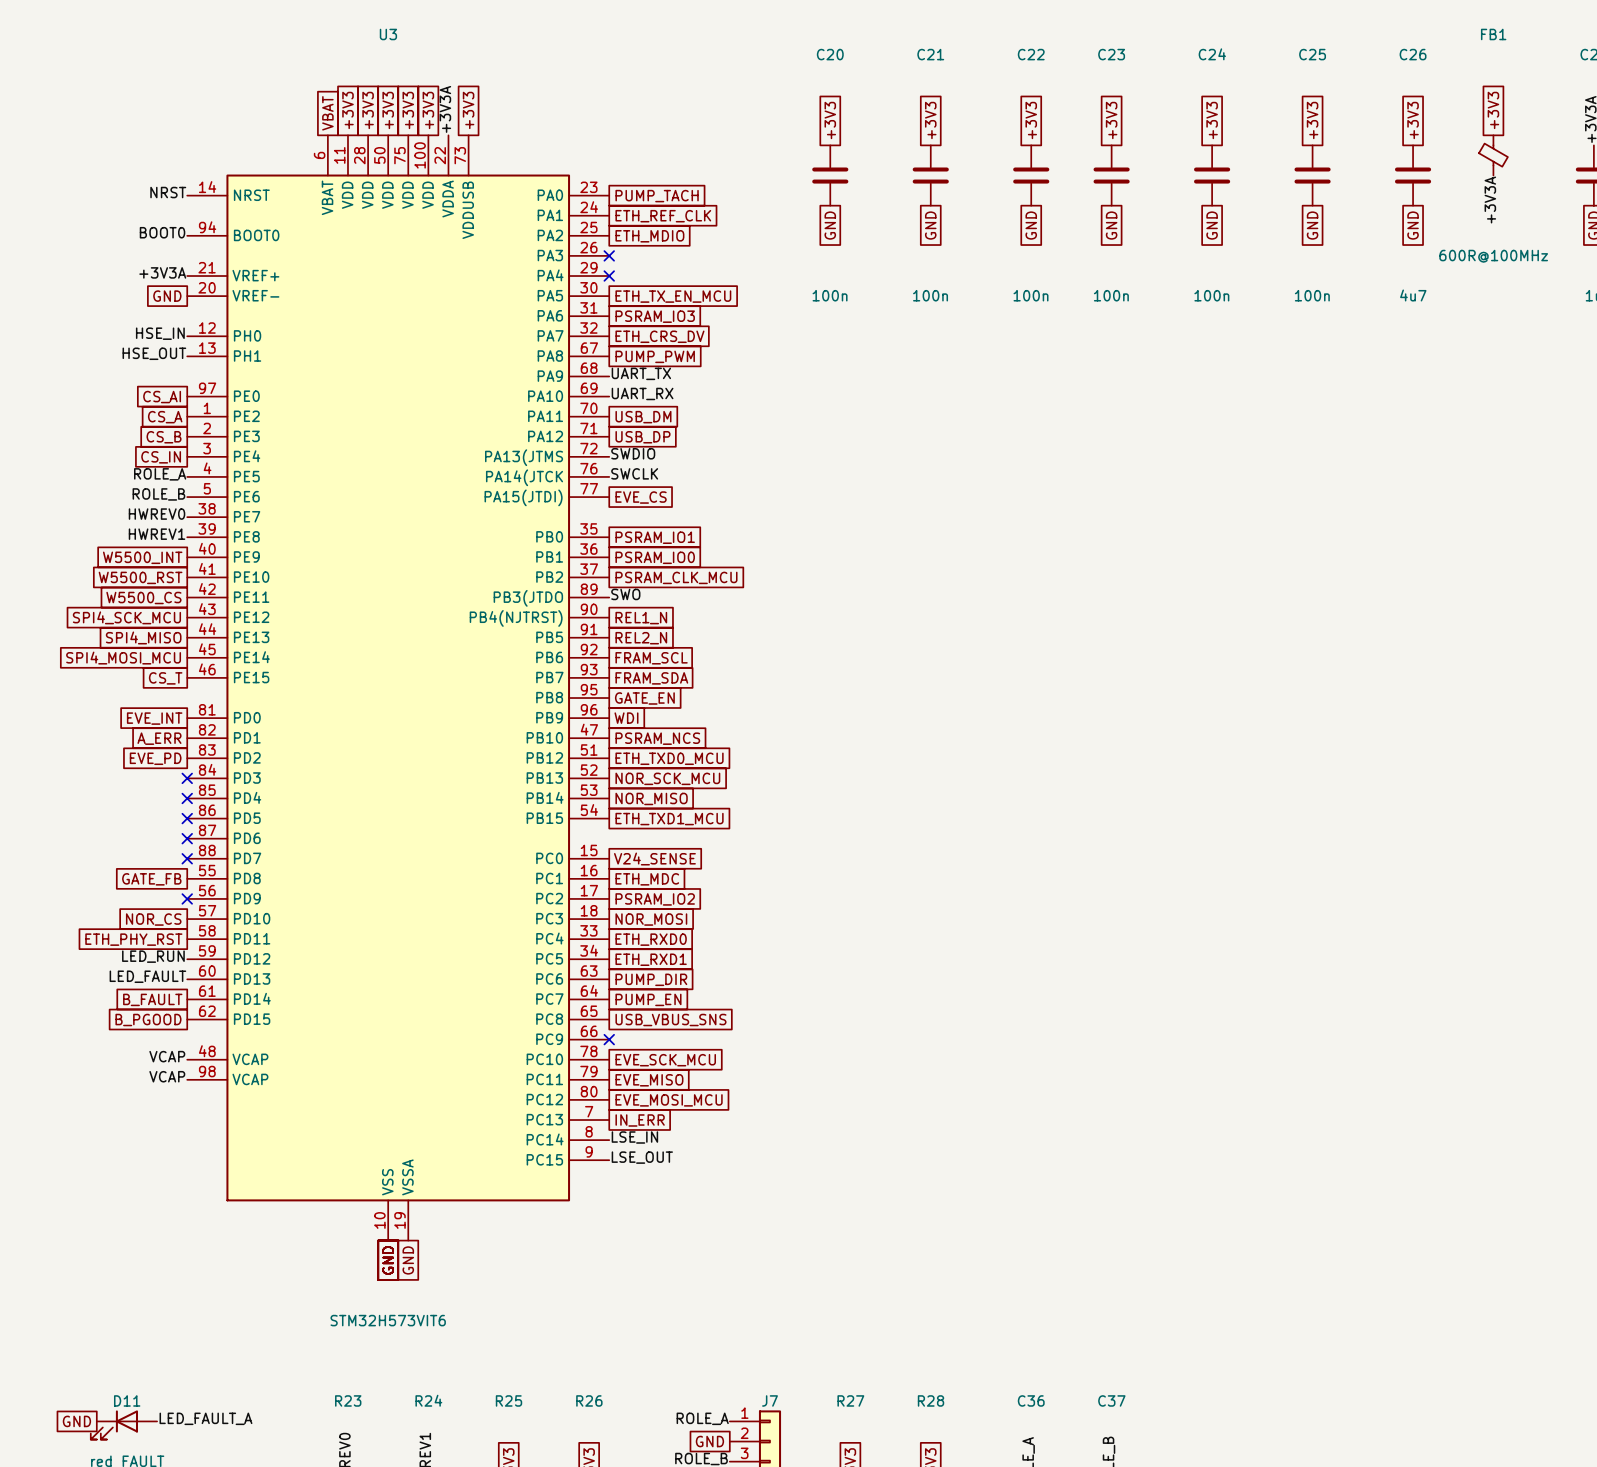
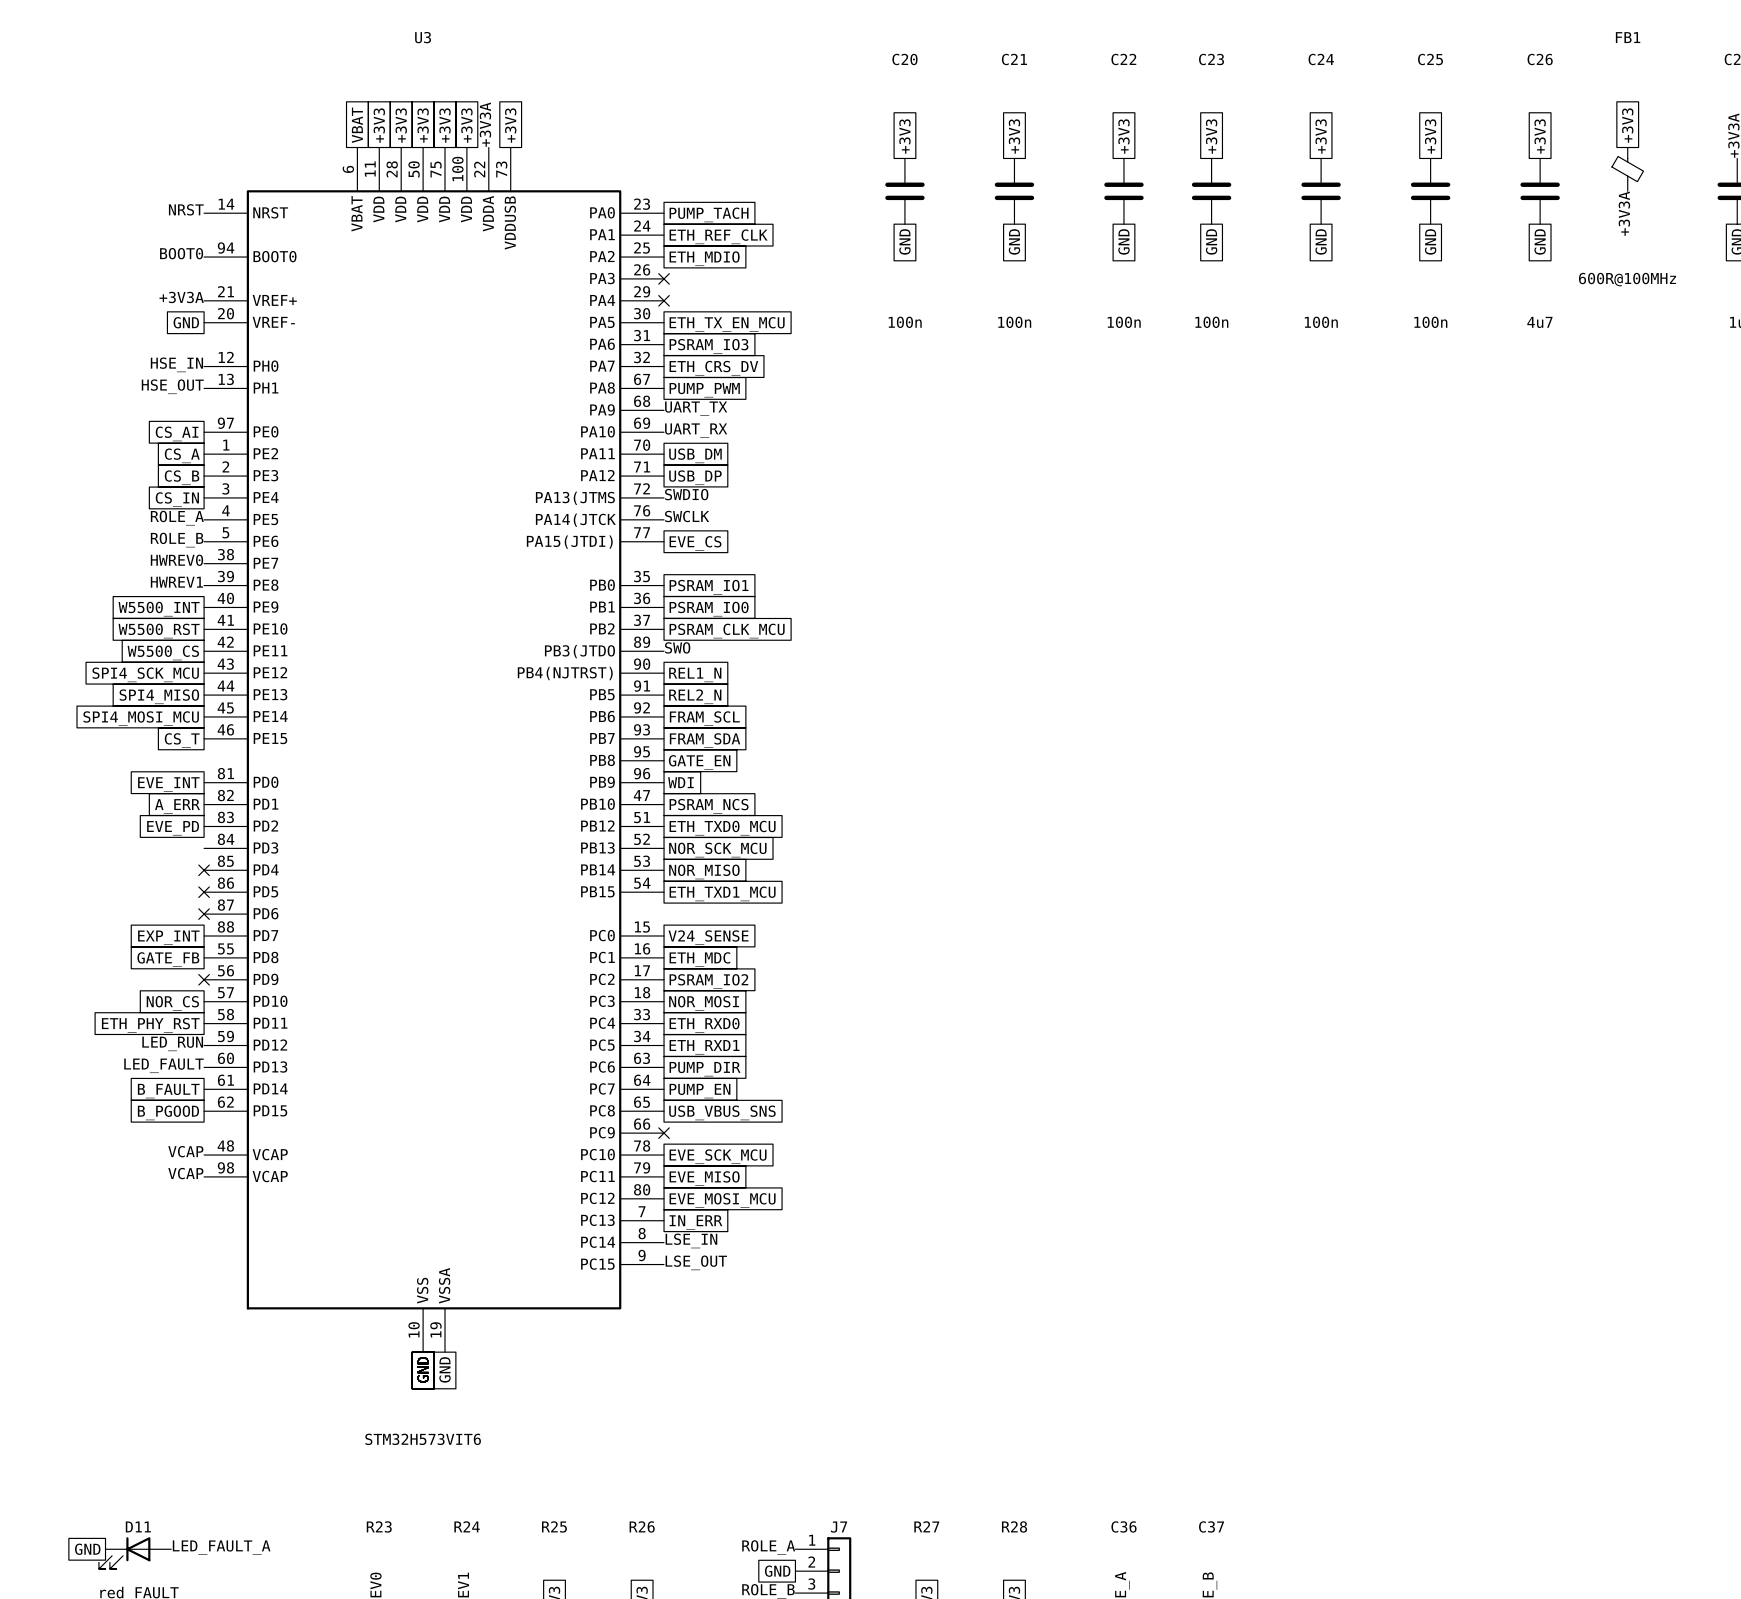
no-connect mark: (187, 778) -> none
no-connect mark: (187, 858) -> none
global label: none -> EXP_INT (168, 937)

